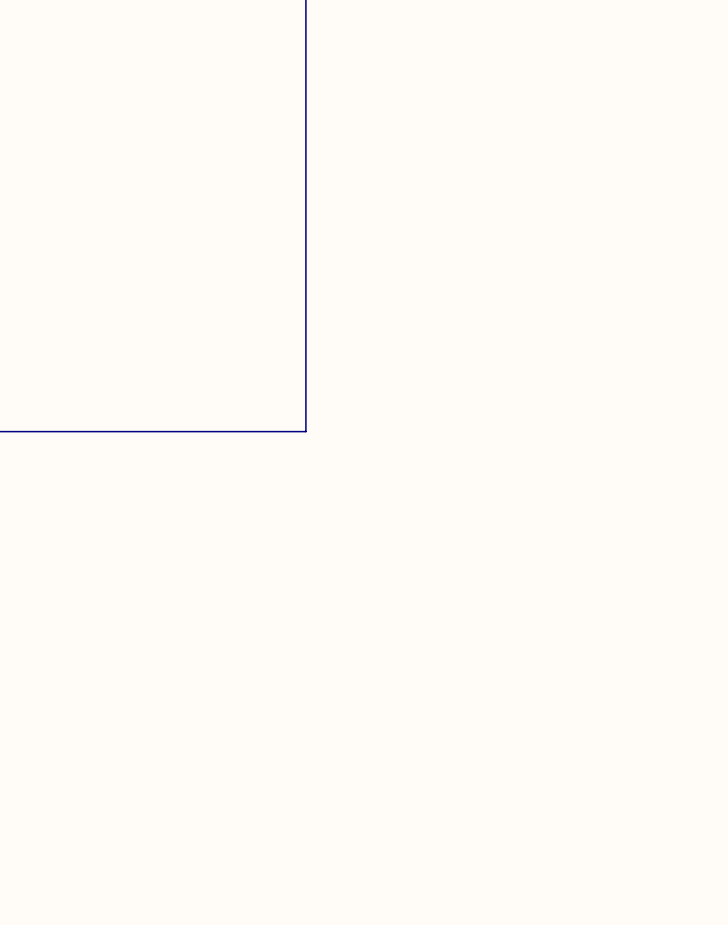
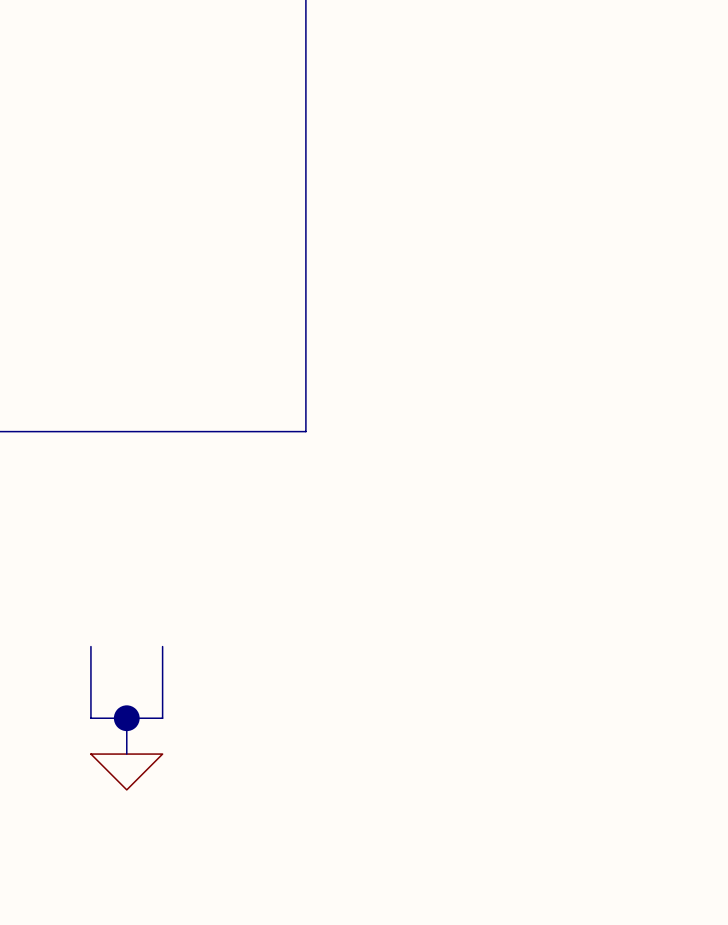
wire: none -> (90, 646) (90, 718) (162, 718) (162, 646)
wire: none -> (126, 718) (126, 754)
junction: none -> (126, 718)
power symbol: none -> (126, 771)

